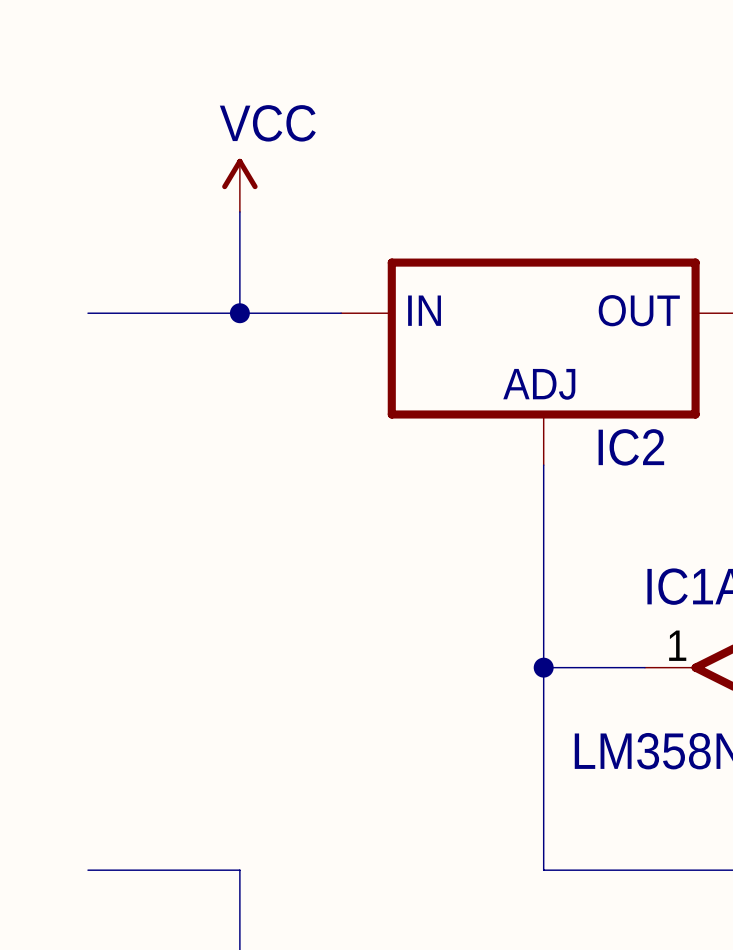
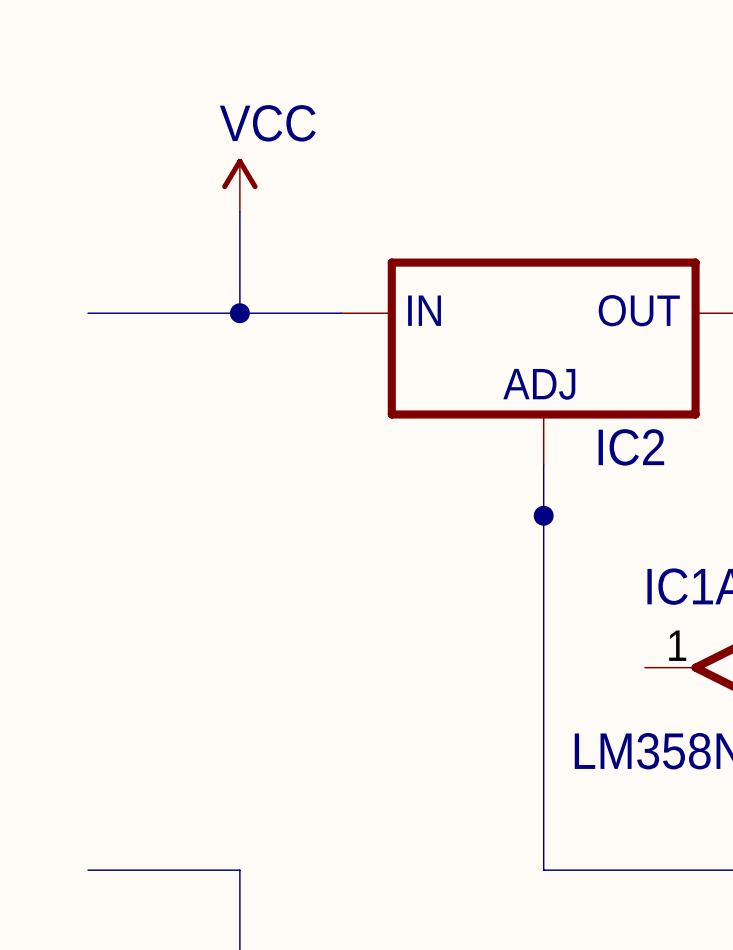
junction: none -> (543, 515)
wire: (543, 667) (644, 667) -> none
junction: (543, 667) -> none

